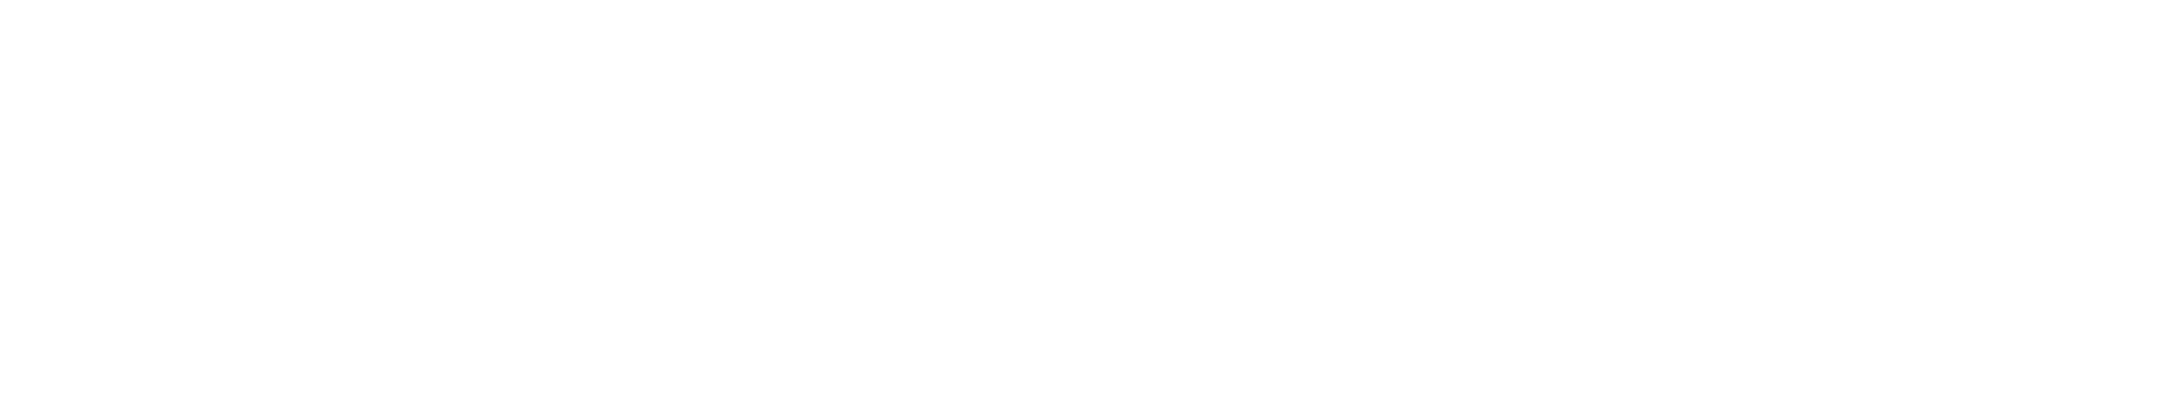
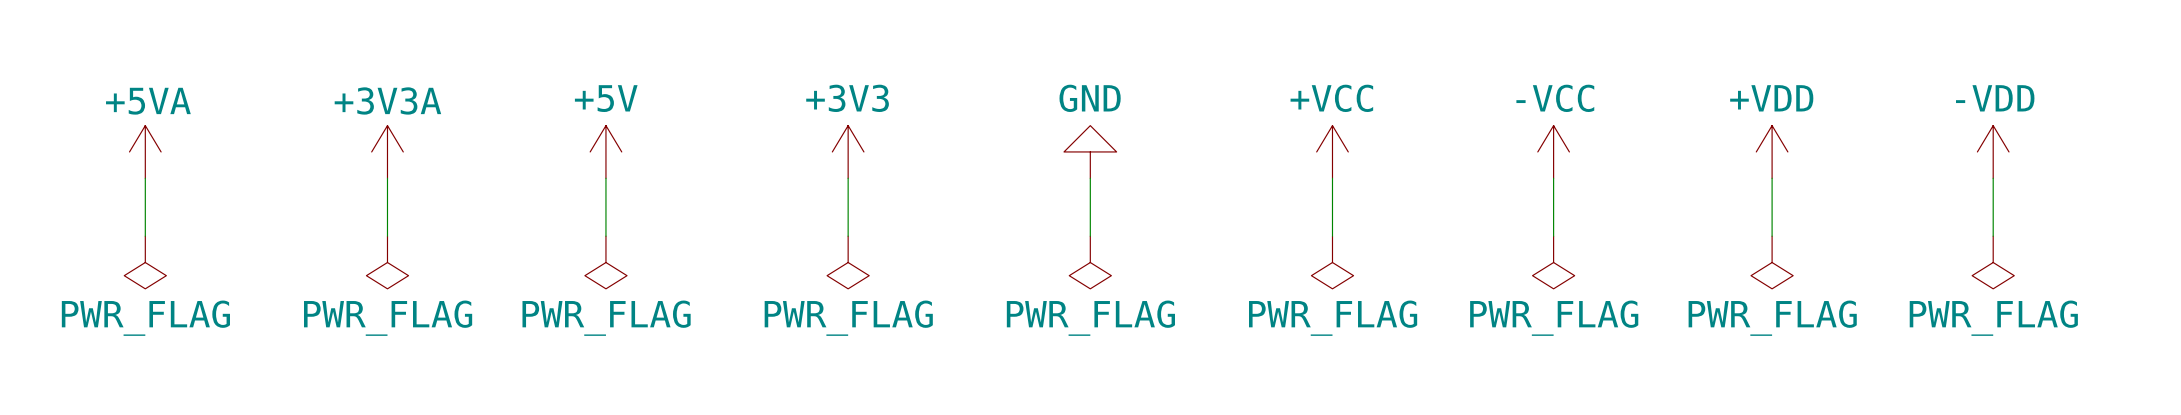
power symbol: none -> +5VA (145, 151)
power symbol: none -> +3V3A (387, 151)
power symbol: none -> +5V (605, 151)
power symbol: none -> +3V3 (848, 151)
power symbol: none -> GND (1090, 151)
power symbol: none -> +VCC (1332, 151)
power symbol: none -> -VCC (1553, 151)
power symbol: none -> +VDD (1772, 151)
power symbol: none -> -VDD (1993, 151)
wire: none -> (145, 178) (145, 236)
wire: none -> (387, 178) (387, 236)
wire: none -> (605, 178) (605, 236)
wire: none -> (848, 178) (848, 236)
wire: none -> (1090, 178) (1090, 236)
wire: none -> (1332, 178) (1332, 236)
wire: none -> (1553, 178) (1553, 236)
wire: none -> (1772, 178) (1772, 236)
wire: none -> (1993, 178) (1993, 236)
power symbol: none -> PWR_FLAG (145, 262)
power symbol: none -> PWR_FLAG (387, 262)
power symbol: none -> PWR_FLAG (605, 262)
power symbol: none -> PWR_FLAG (848, 262)
power symbol: none -> PWR_FLAG (1090, 262)
power symbol: none -> PWR_FLAG (1332, 262)
power symbol: none -> PWR_FLAG (1553, 262)
power symbol: none -> PWR_FLAG (1772, 262)
power symbol: none -> PWR_FLAG (1993, 262)

